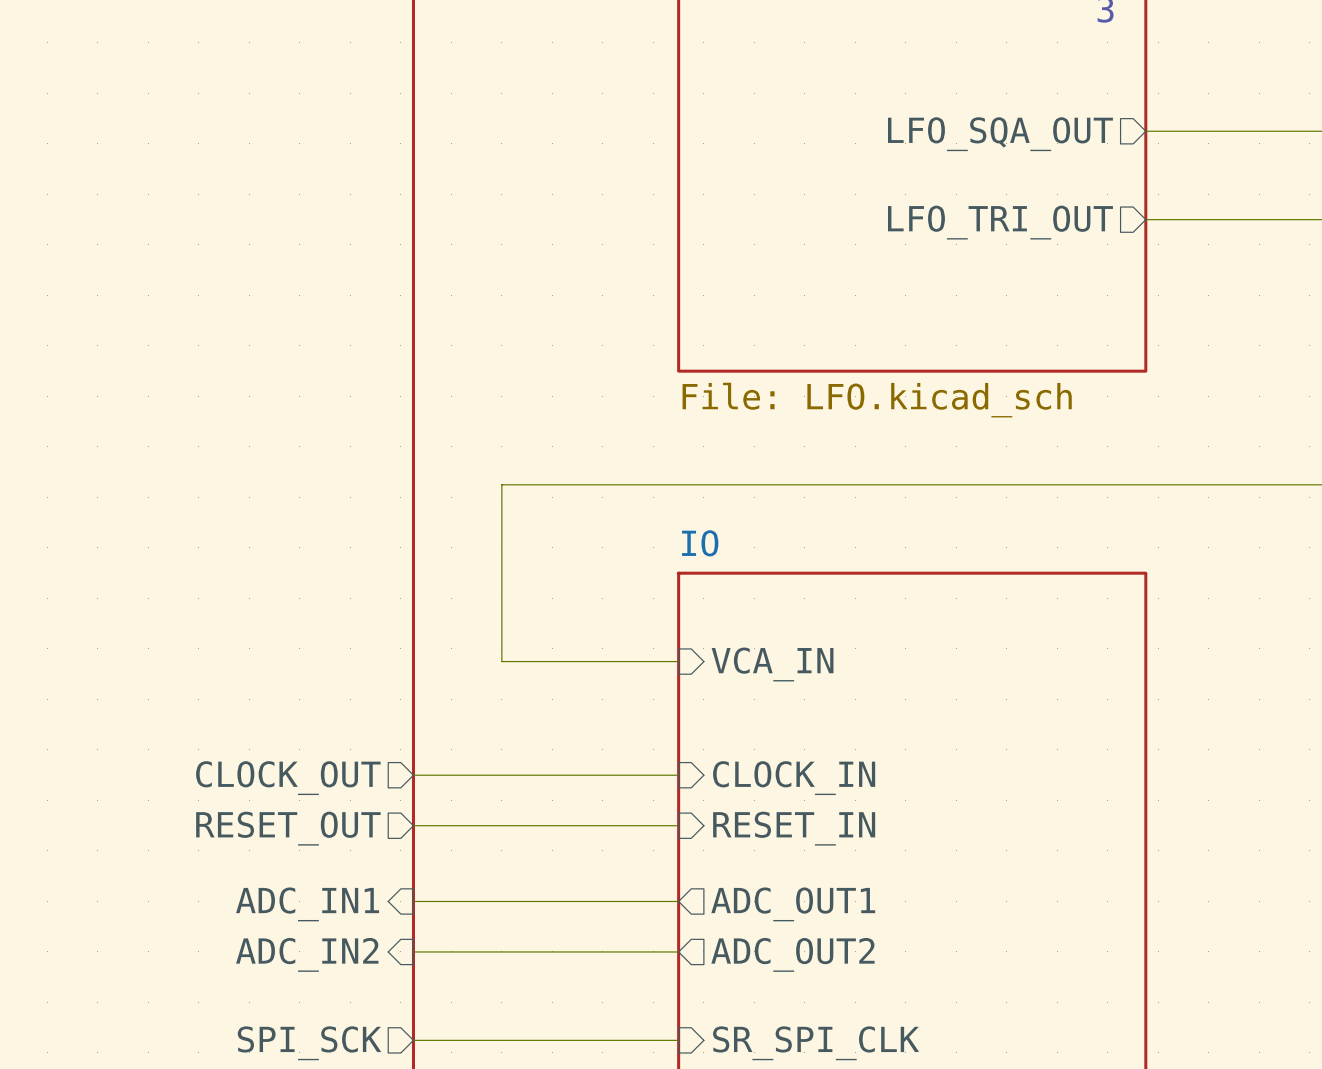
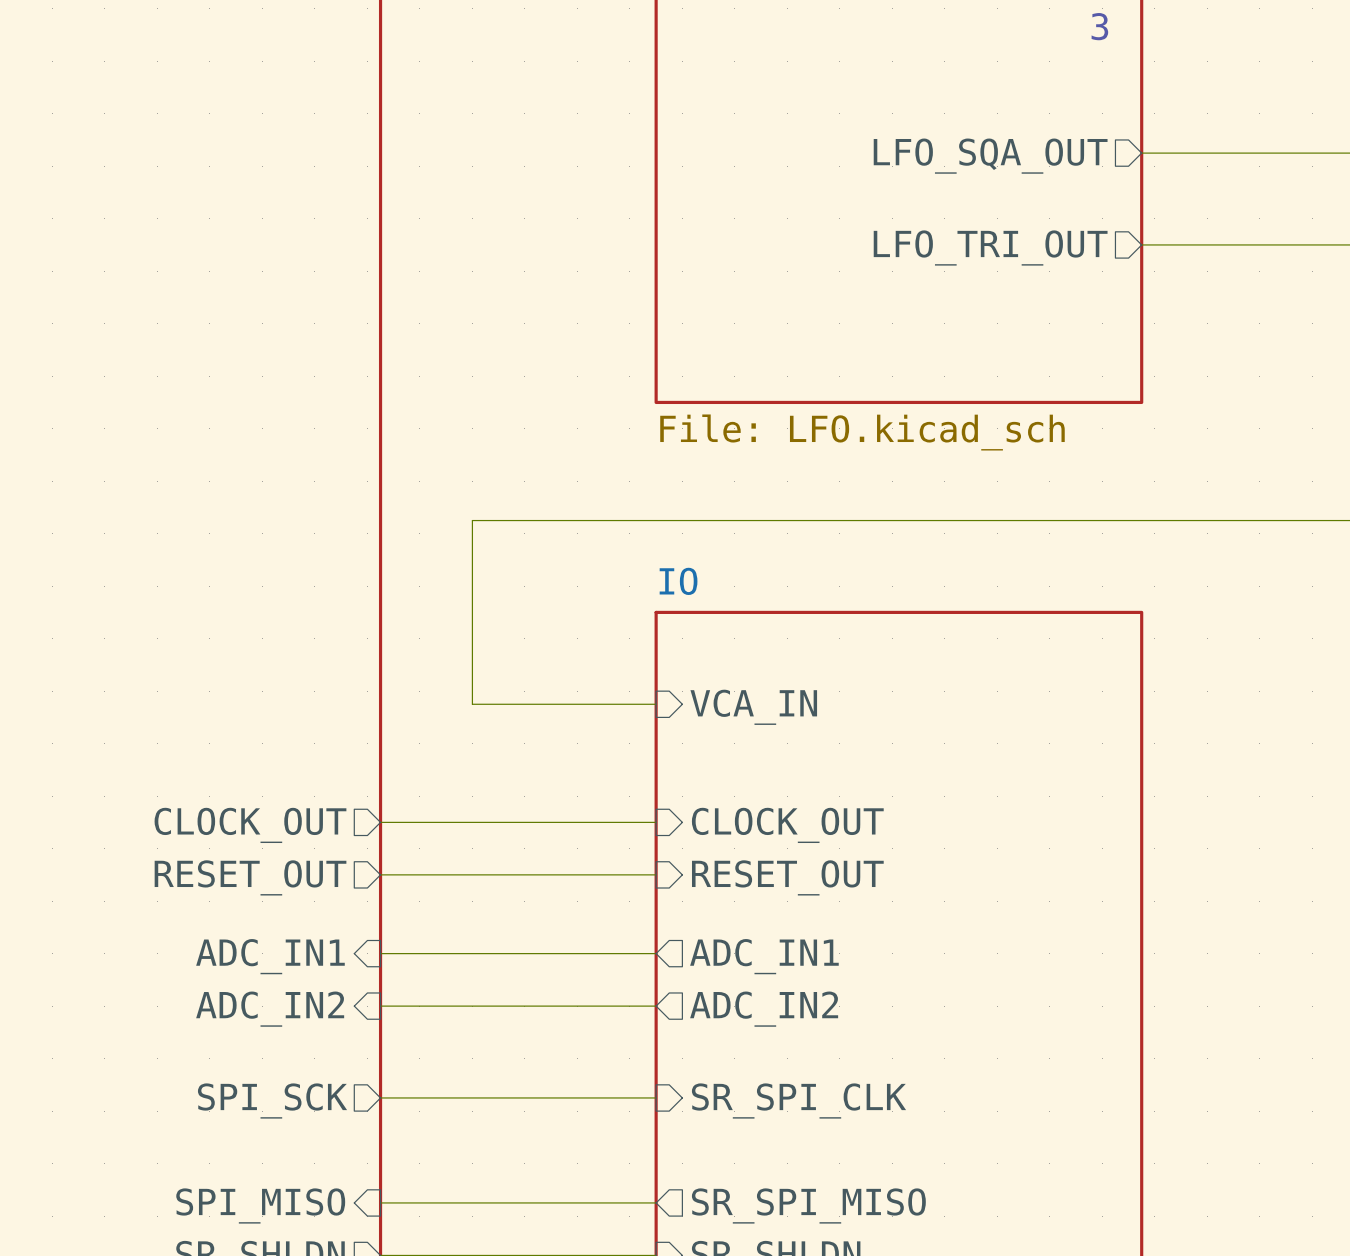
sheet pin: CLOCK_IN (794, 778) -> CLOCK_OUT (787, 825)
sheet pin: RESET_IN (794, 828) -> RESET_OUT (787, 877)
sheet pin: ADC_OUT1 (793, 904) -> ADC_IN1 (764, 956)
sheet pin: ADC_OUT2 (792, 954) -> ADC_IN2 (764, 1009)

